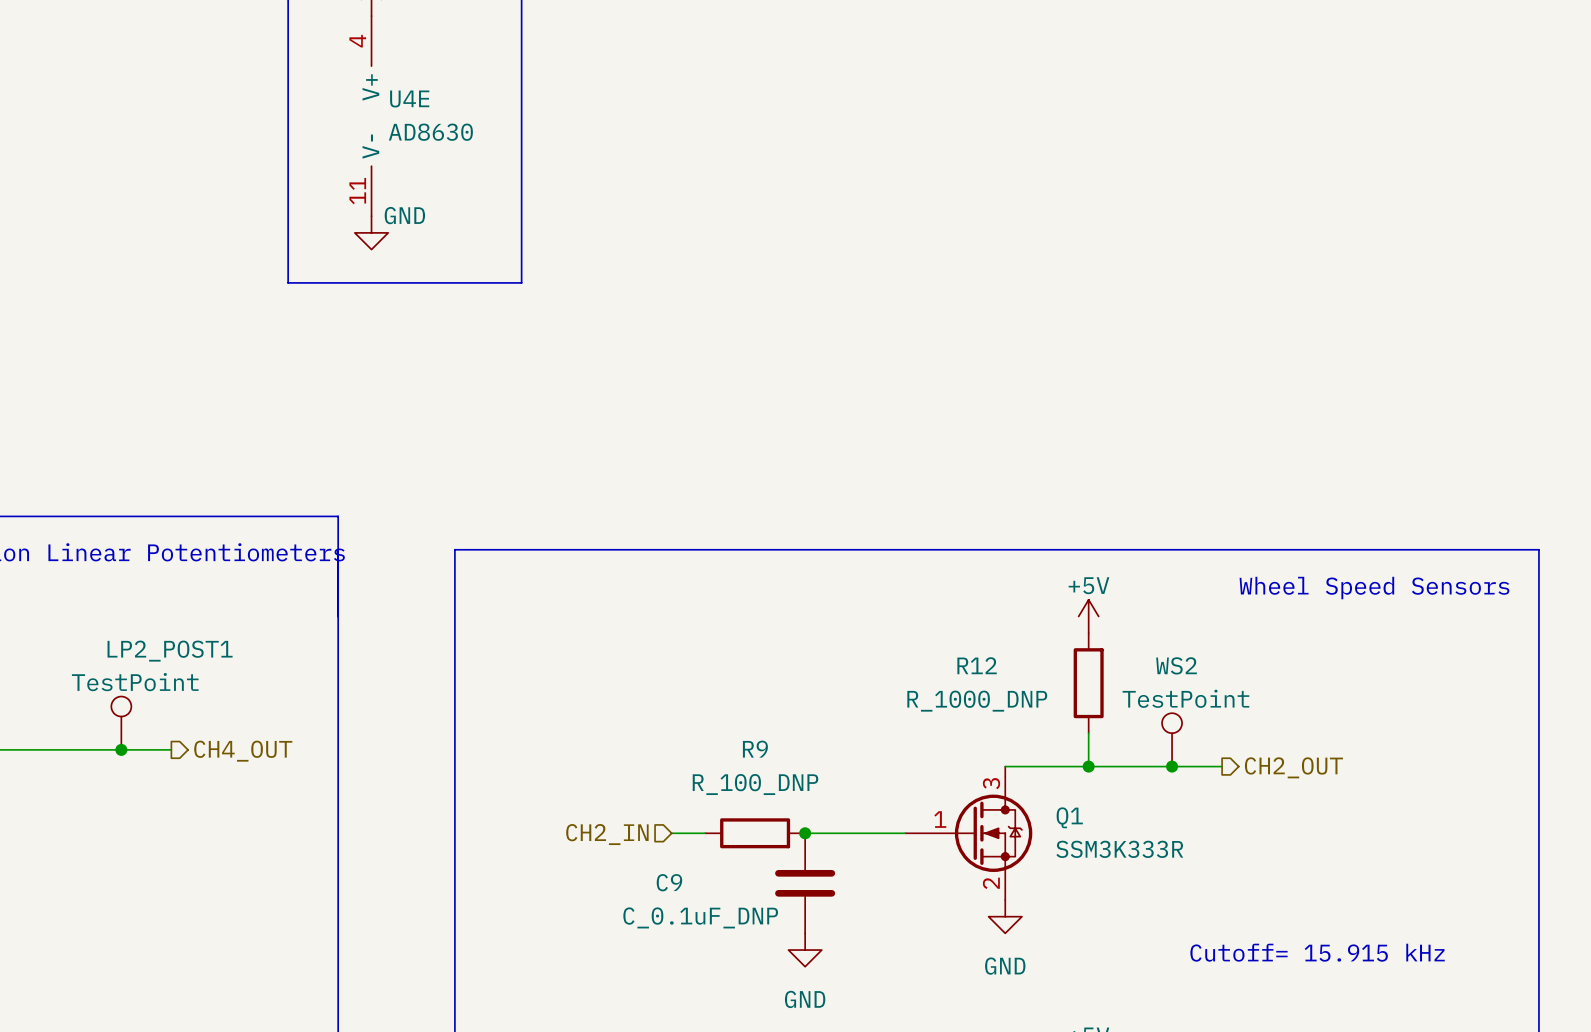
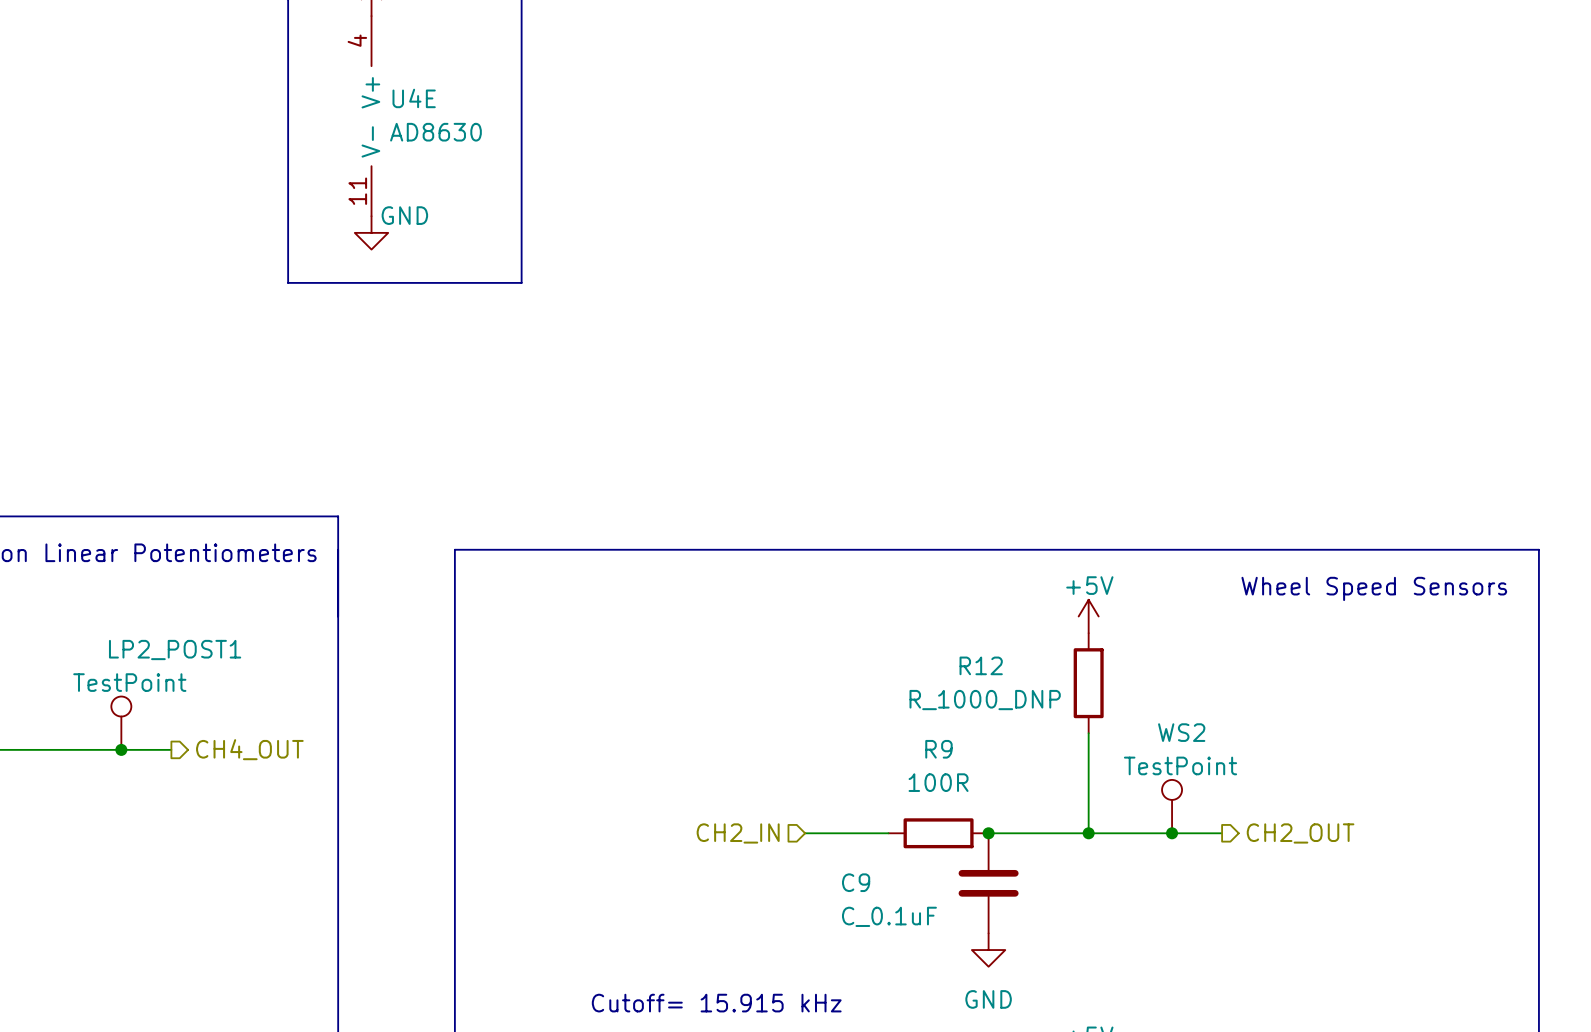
WS2 position: (1172, 739) -> (1172, 806)
wire: (1005, 766) (1222, 766) -> none
wire: none -> (1088, 766) (1088, 833)
junction: (1088, 766) -> none
junction: (1172, 766) -> none
hierarchical label position: CH2_OUT (1293, 767) -> CH2_OUT (1300, 833)
R9 value: R_100_DNP (755, 784) -> 100R (938, 782)
wire: (671, 833) (705, 833) -> none
R9 position: (755, 833) -> (938, 833)
junction: (805, 833) -> none
Q1: SSM3K333R (968, 833) -> none
wire: none -> (988, 833) (1222, 833)
junction: none -> (988, 833)
junction: none -> (1088, 833)
junction: none -> (1172, 833)
hierarchical label position: CH2_IN (607, 834) -> CH2_IN (738, 833)
C9 position: (805, 883) -> (988, 883)
power symbol position: GND (1005, 916) -> GND (988, 950)
C9 value: C_0.1uF_DNP (700, 917) -> C_0.1uF (889, 916)
power symbol: GND (805, 950) -> none
text: Cutoff= 15.915 kHz (1317, 952) -> none
text: none -> Cutoff= 15.915 kHz (716, 1003)

